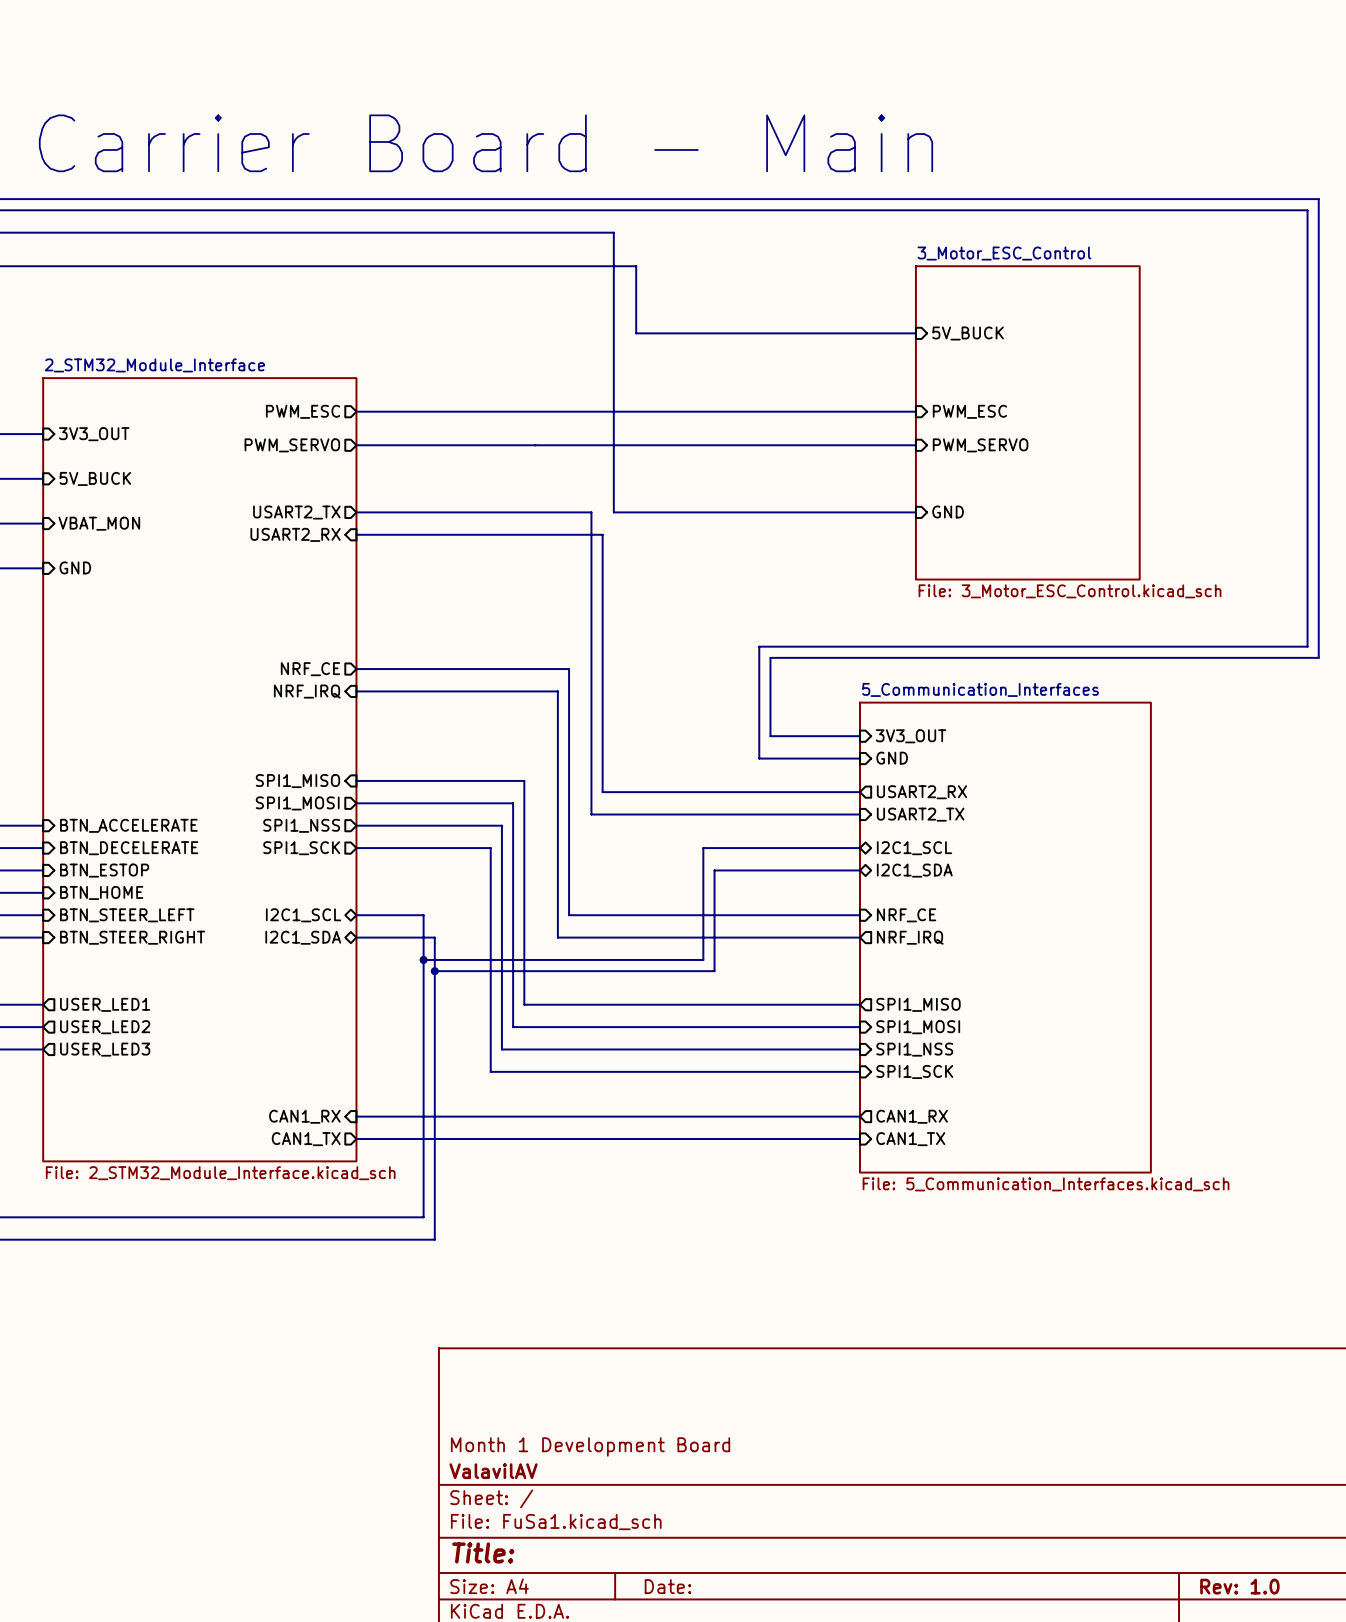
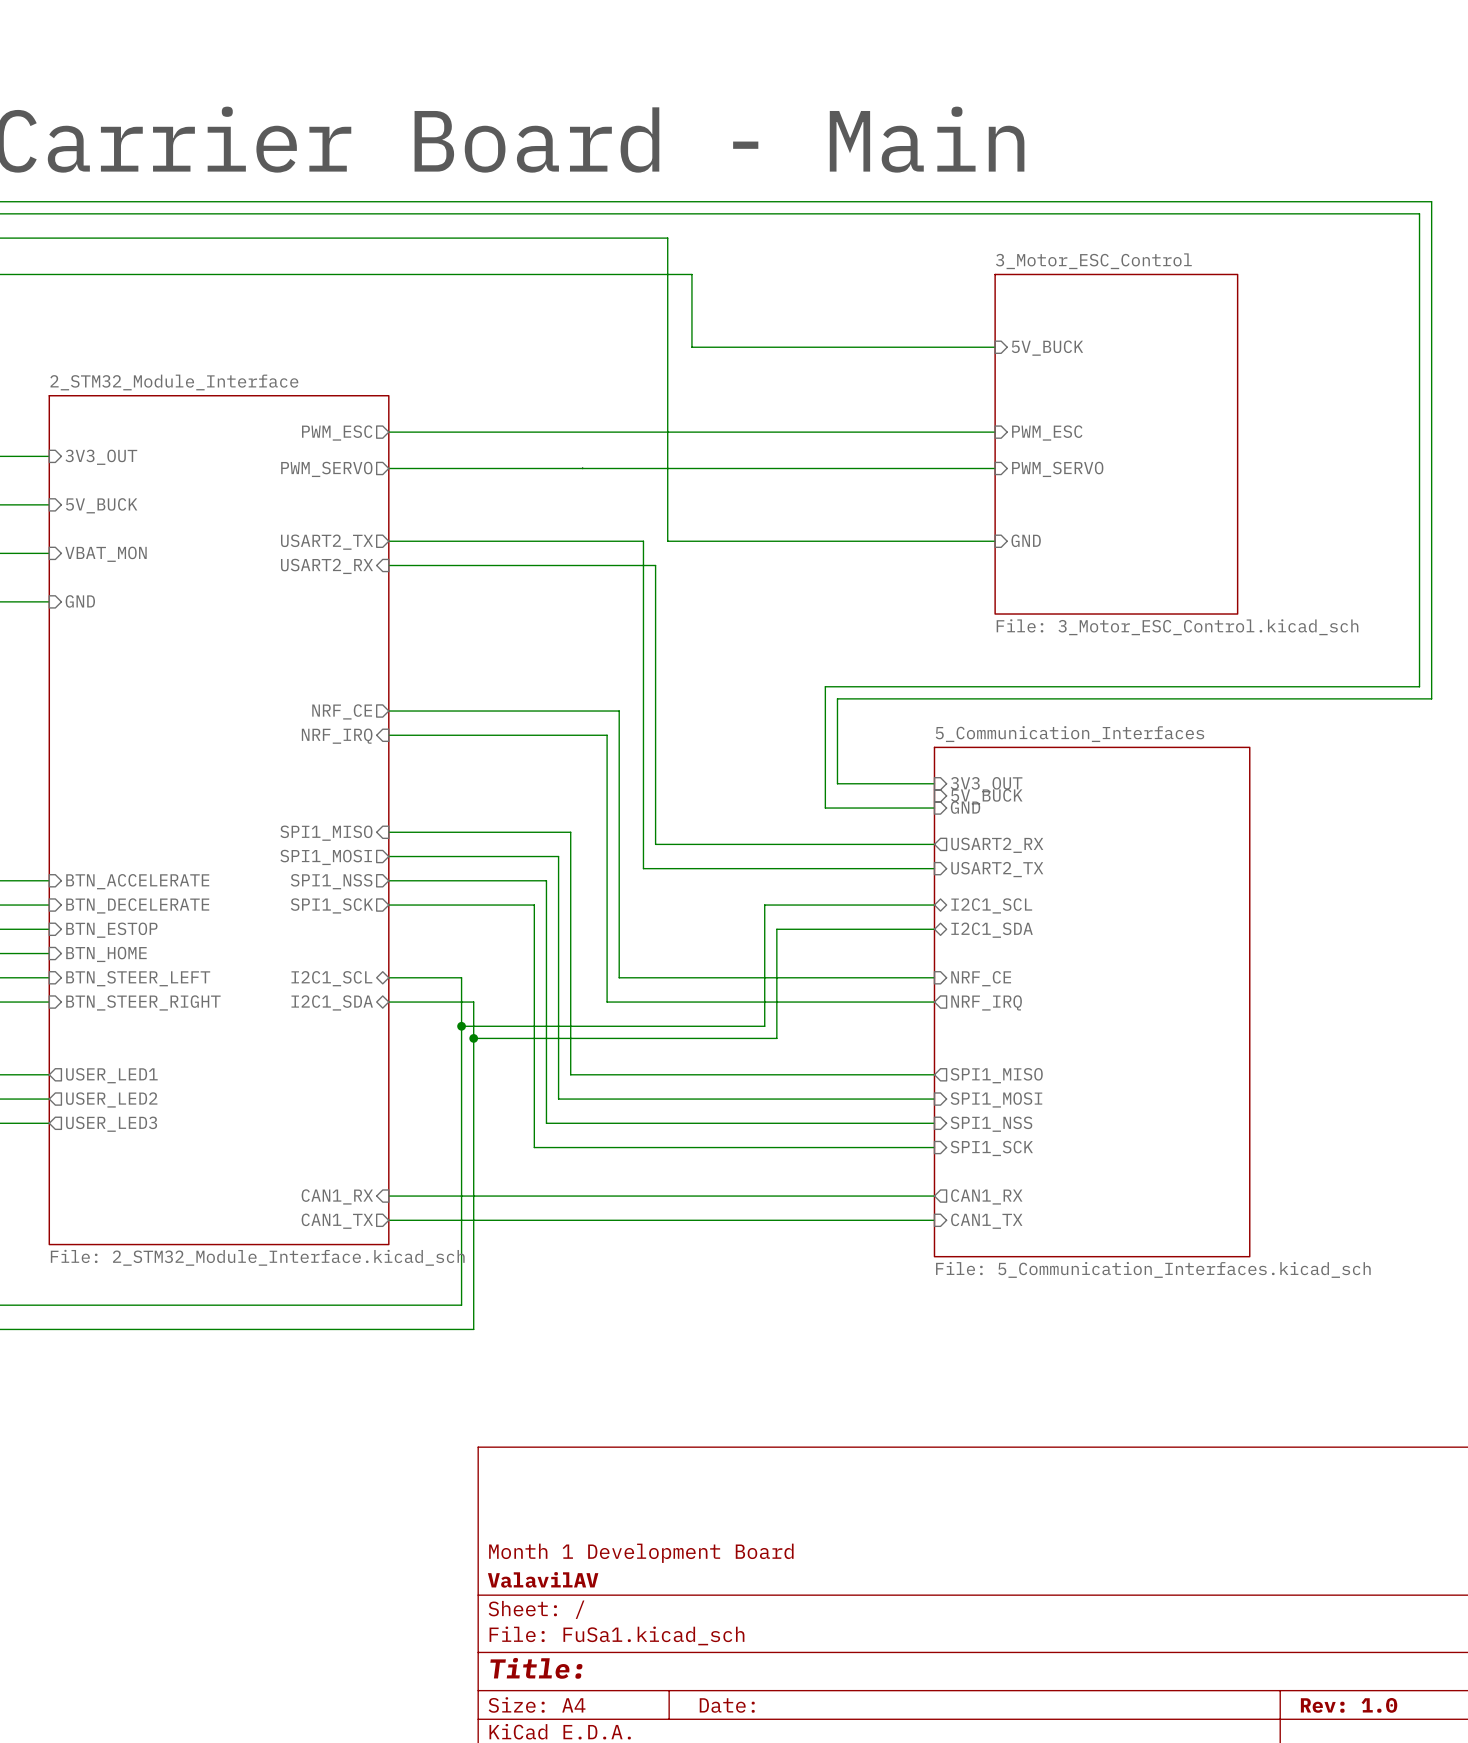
sheet pin: none -> 5V_BUCK (986, 796)

